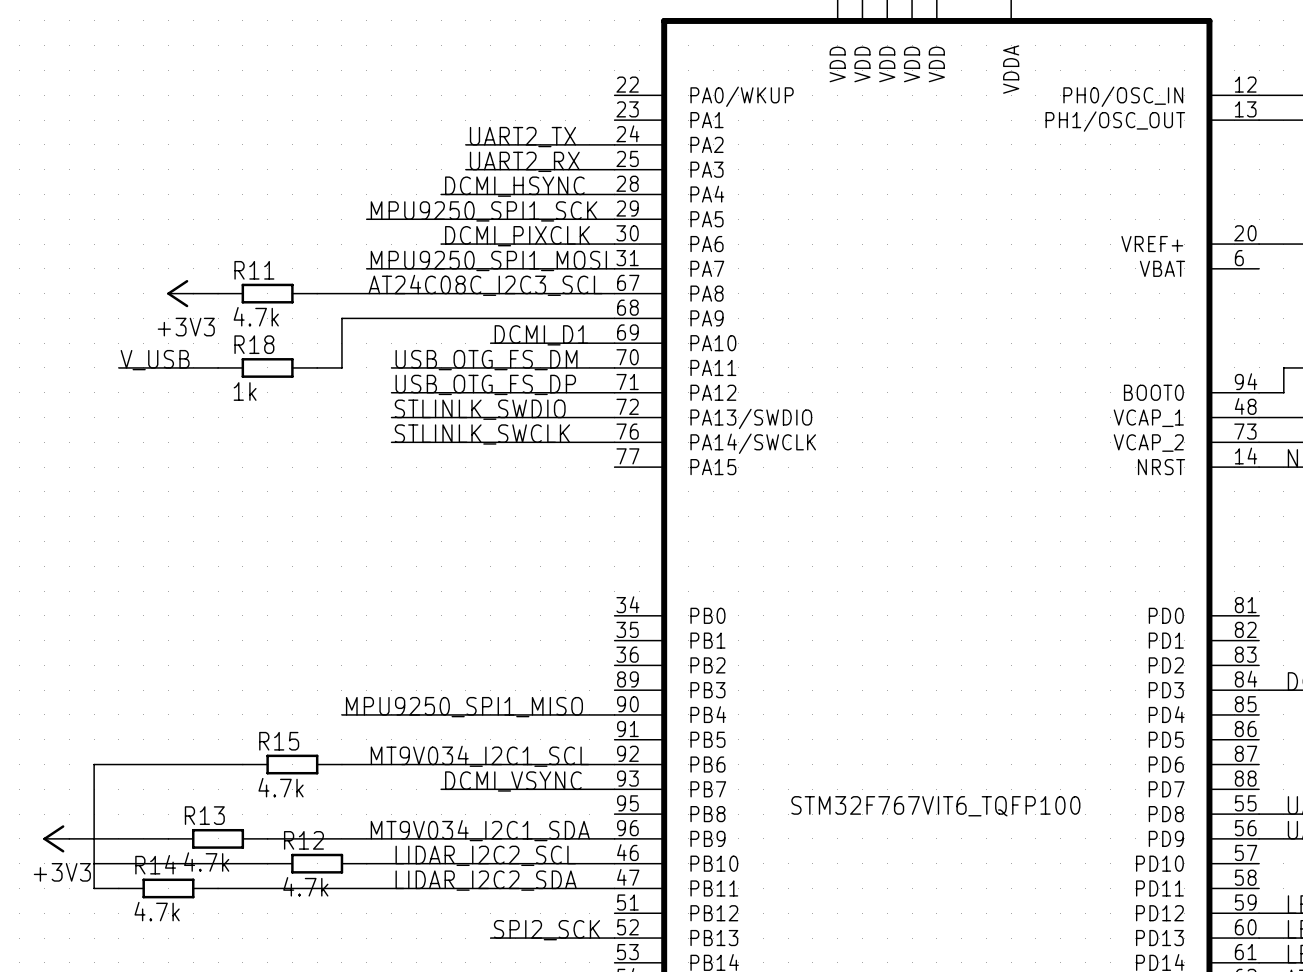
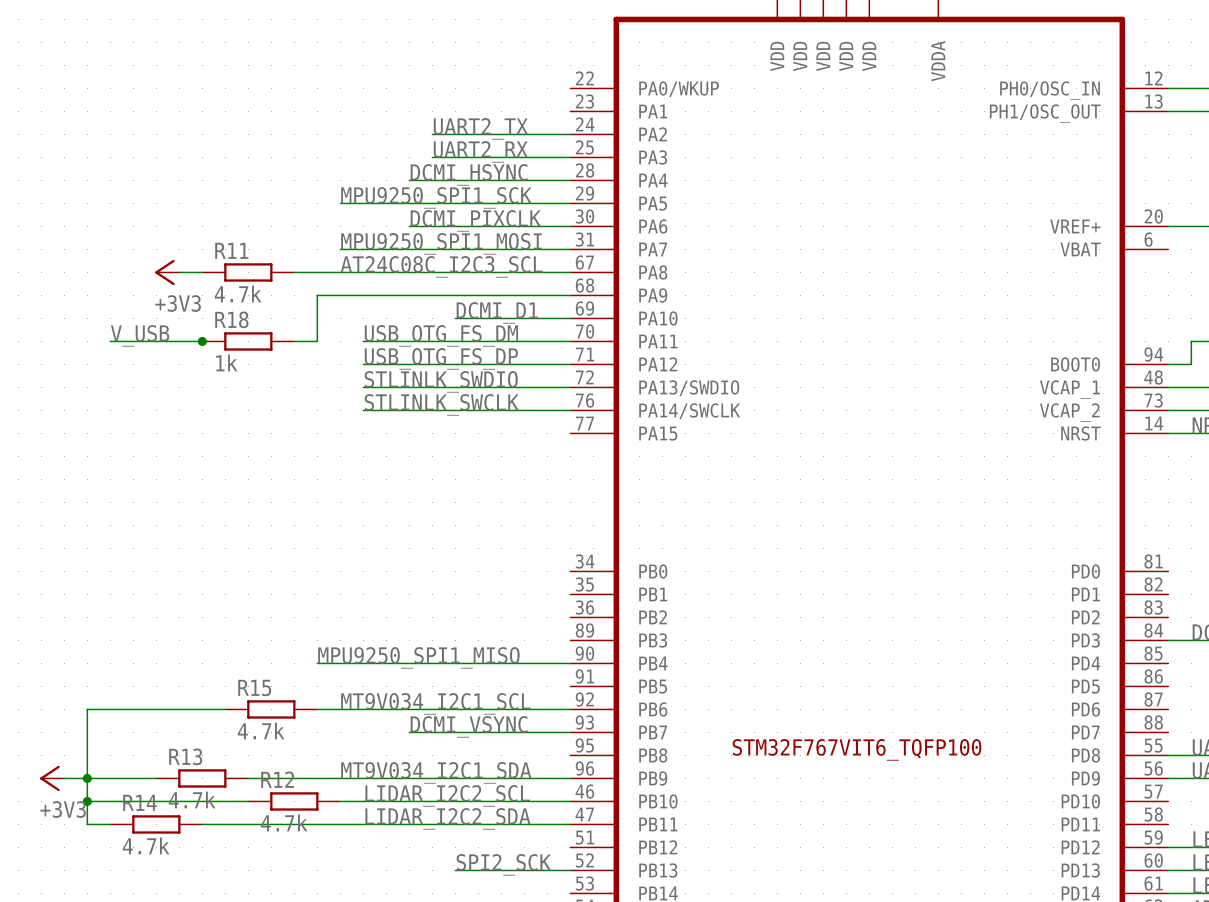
junction: none -> (202, 341)
junction: none -> (87, 778)
junction: none -> (87, 801)

